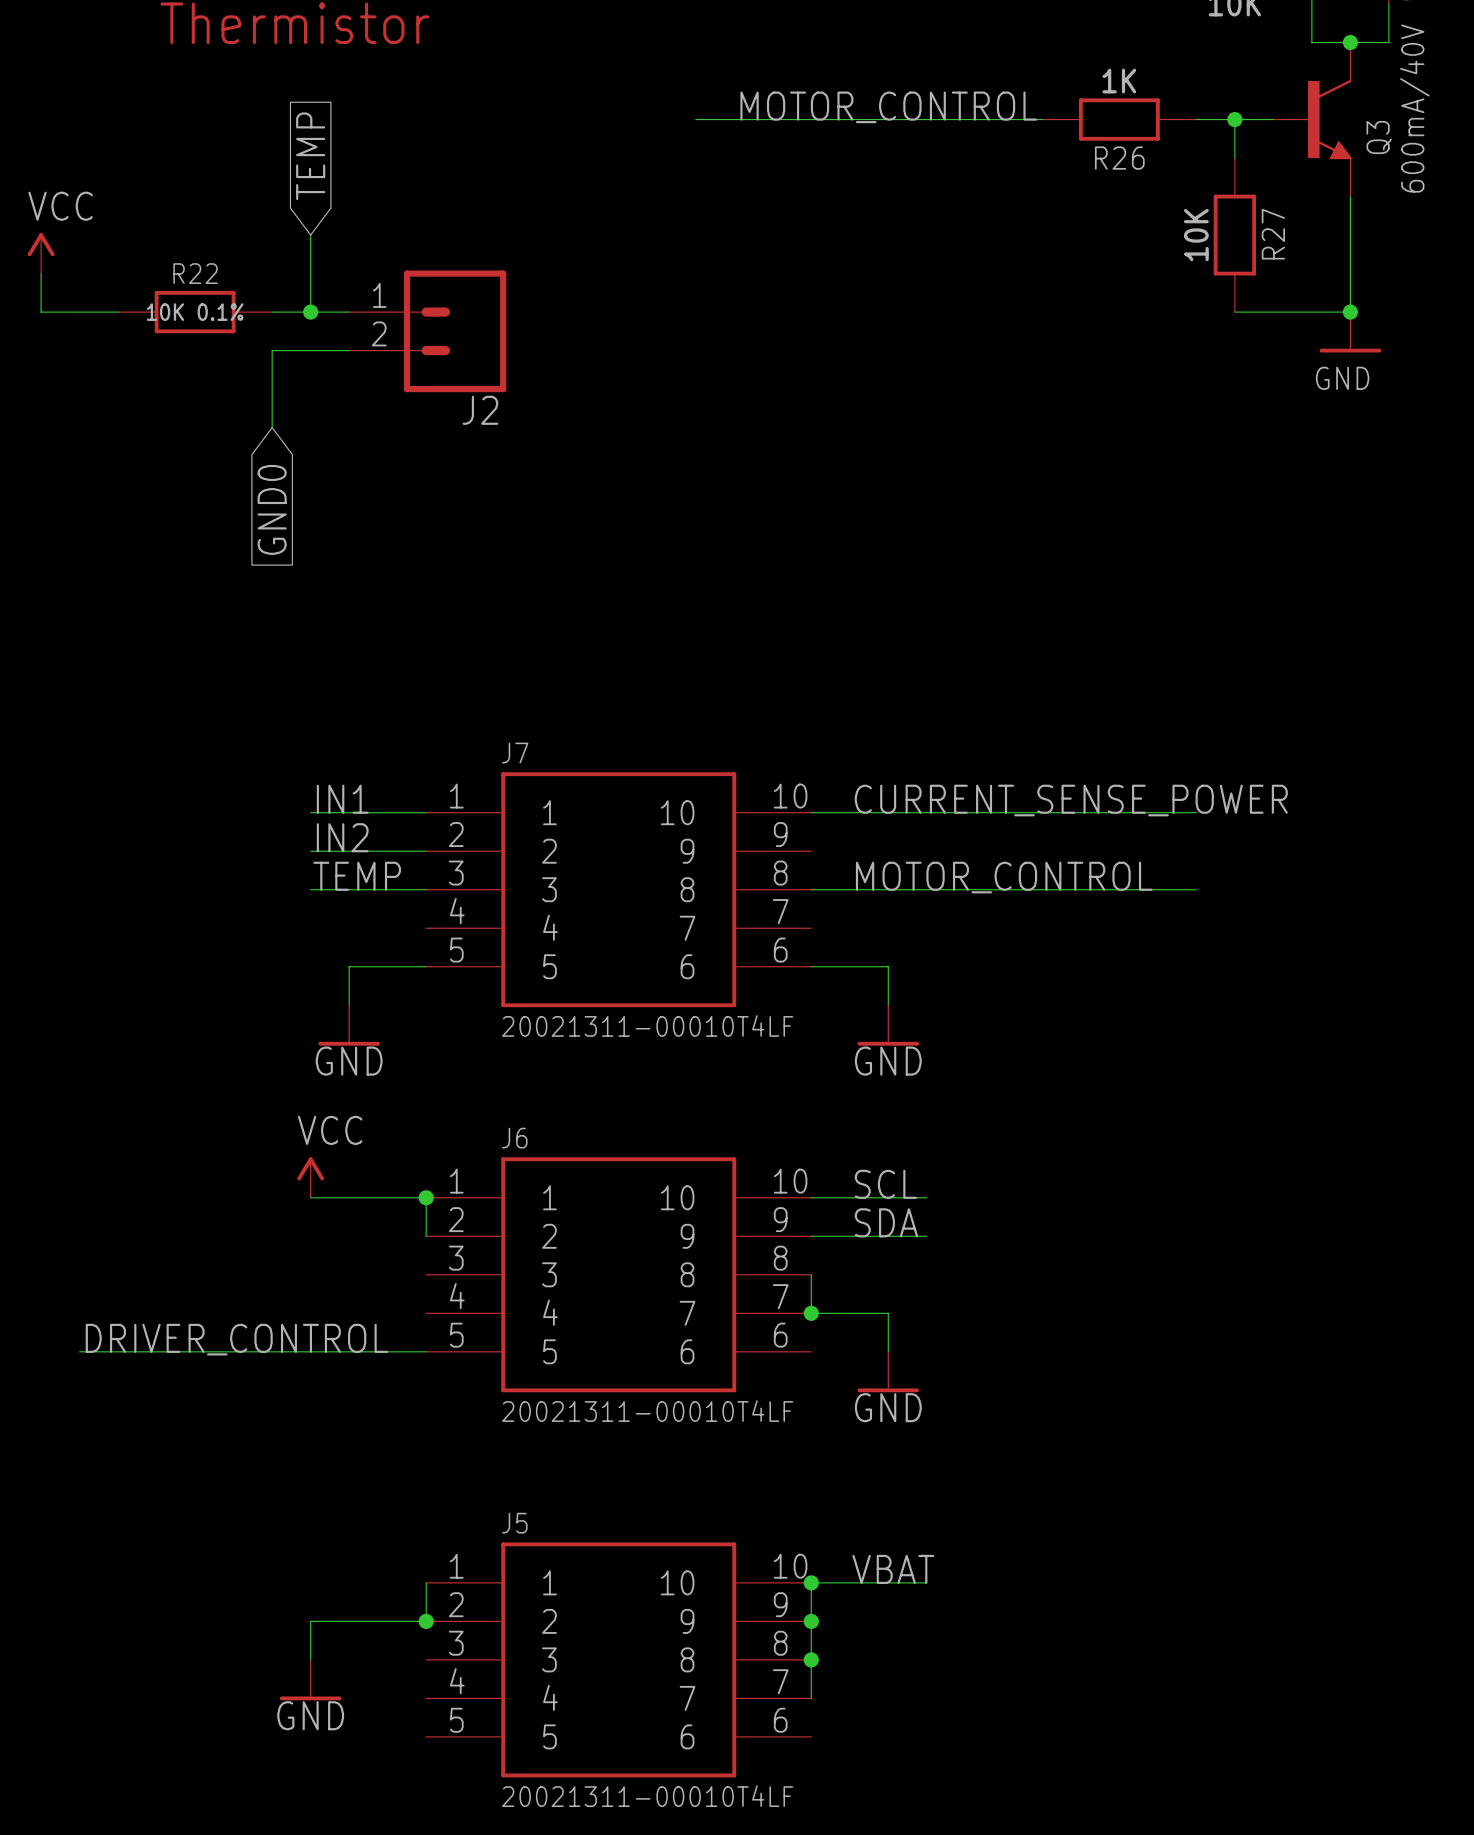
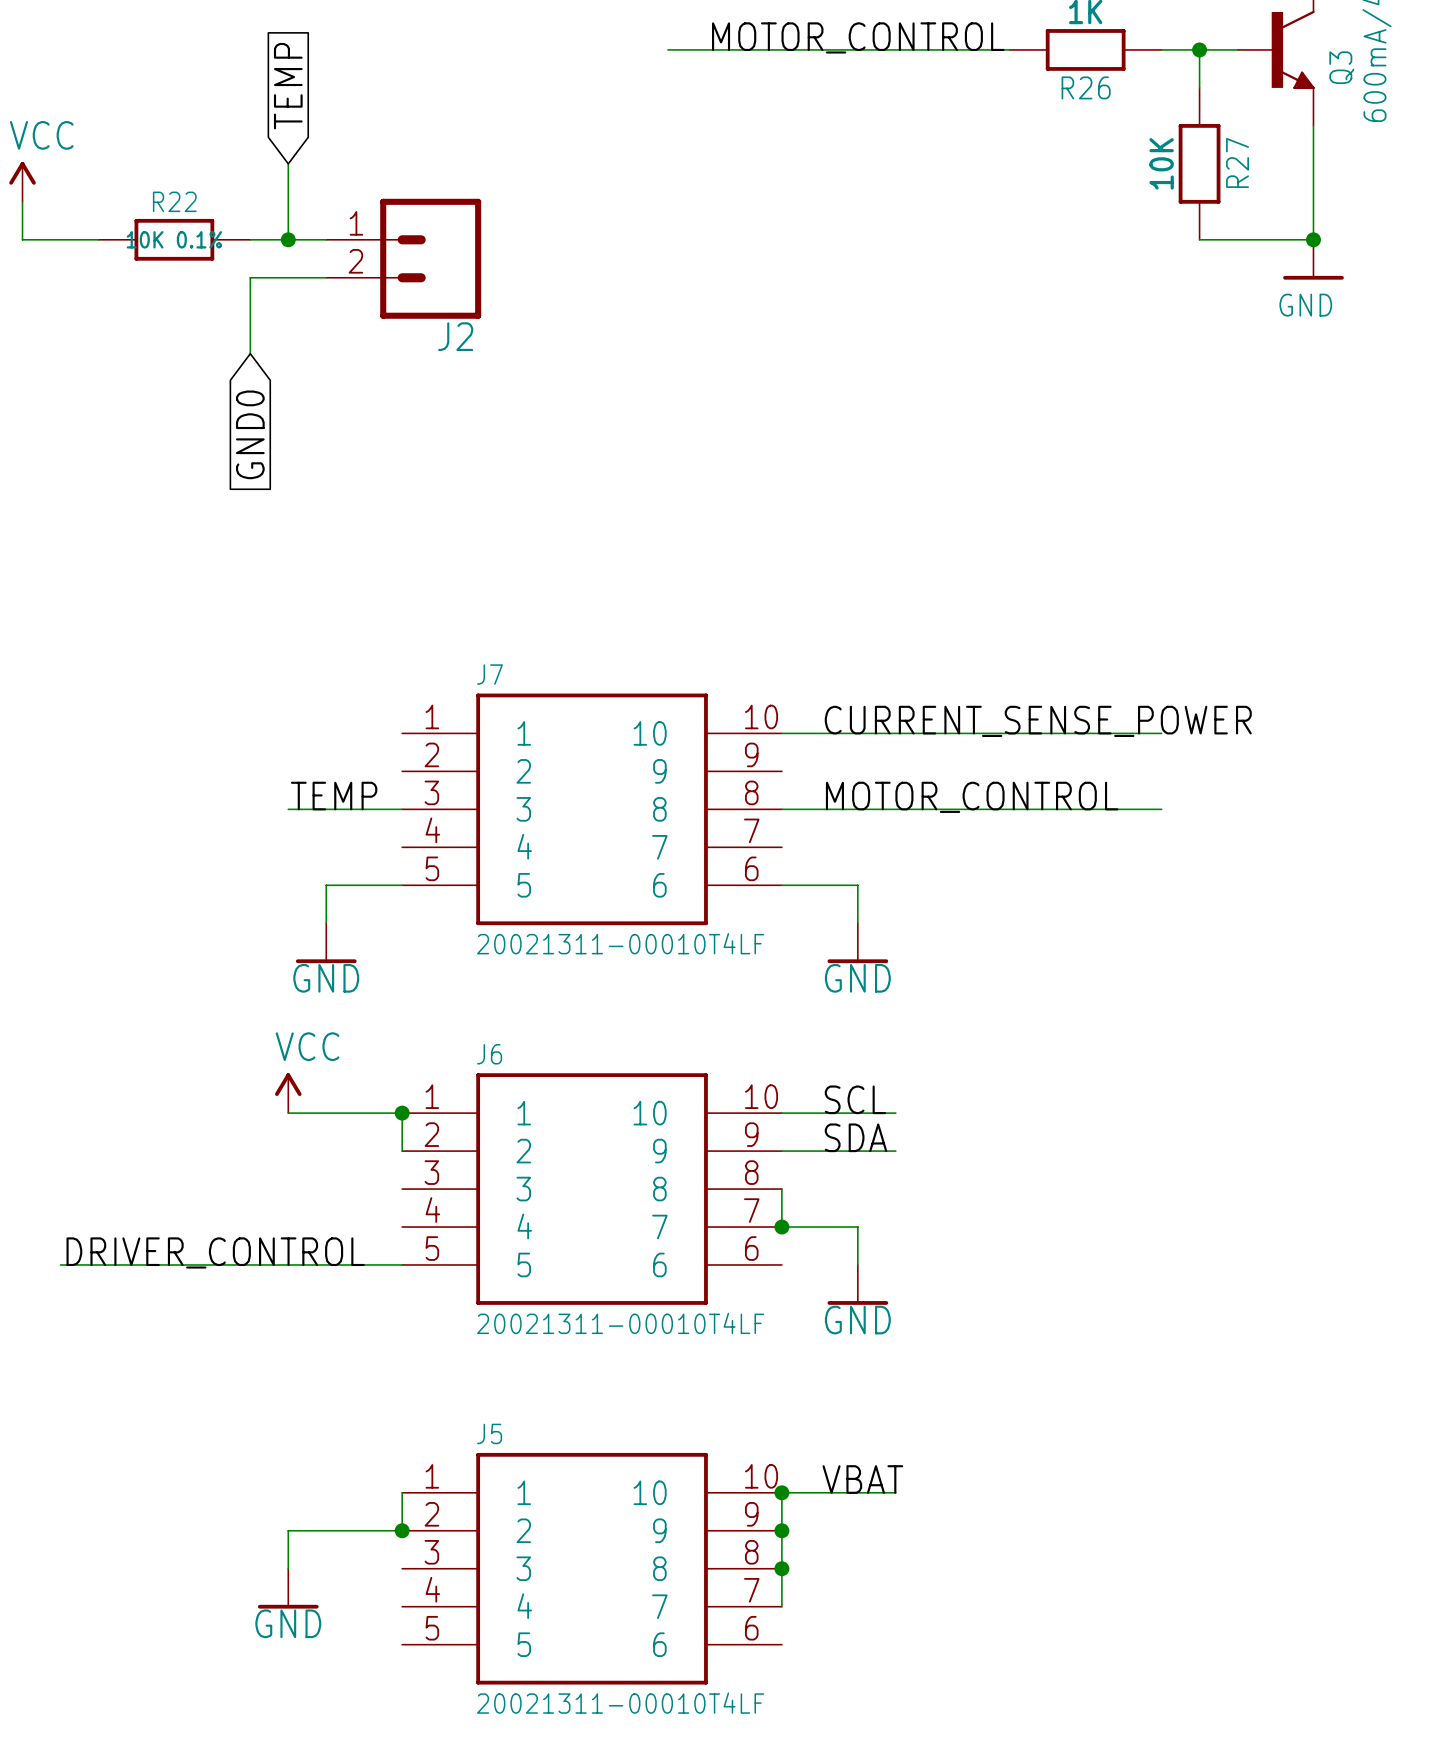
label: IN1 (342, 799) -> none
wire: (310, 812) (426, 812) -> none
label: IN2 (342, 837) -> none
wire: (310, 851) (426, 851) -> none

